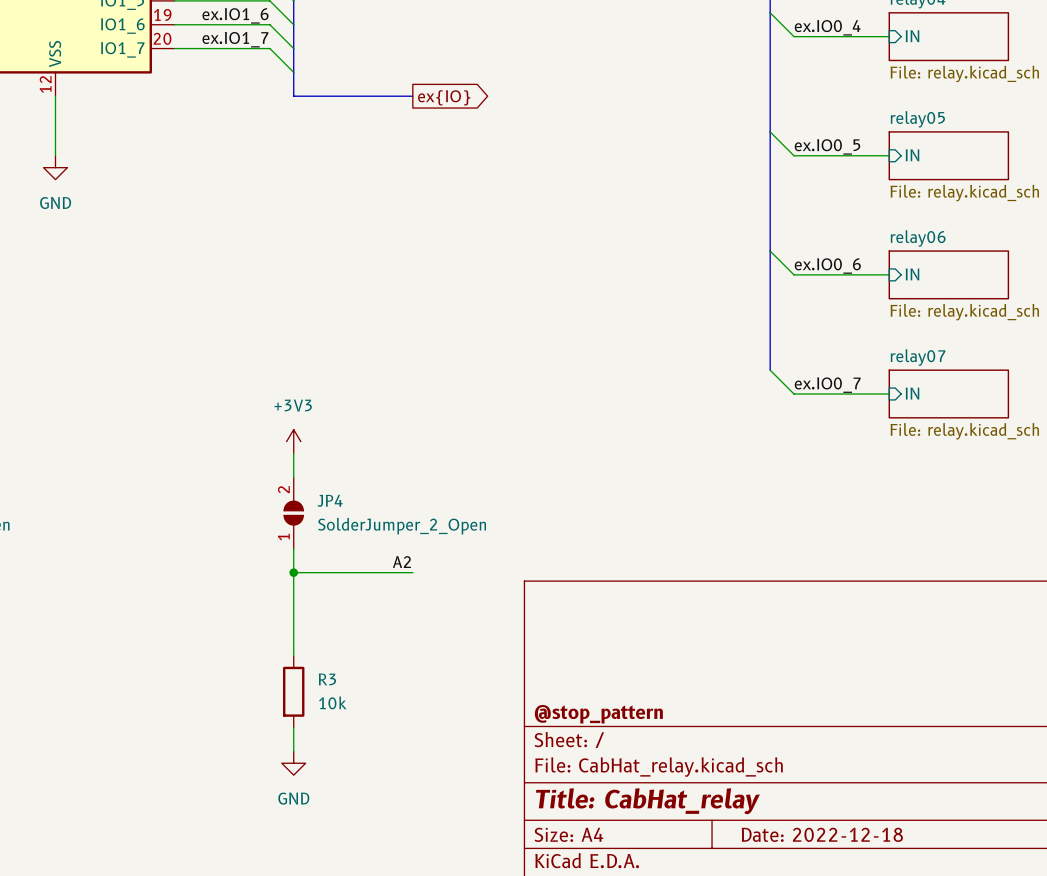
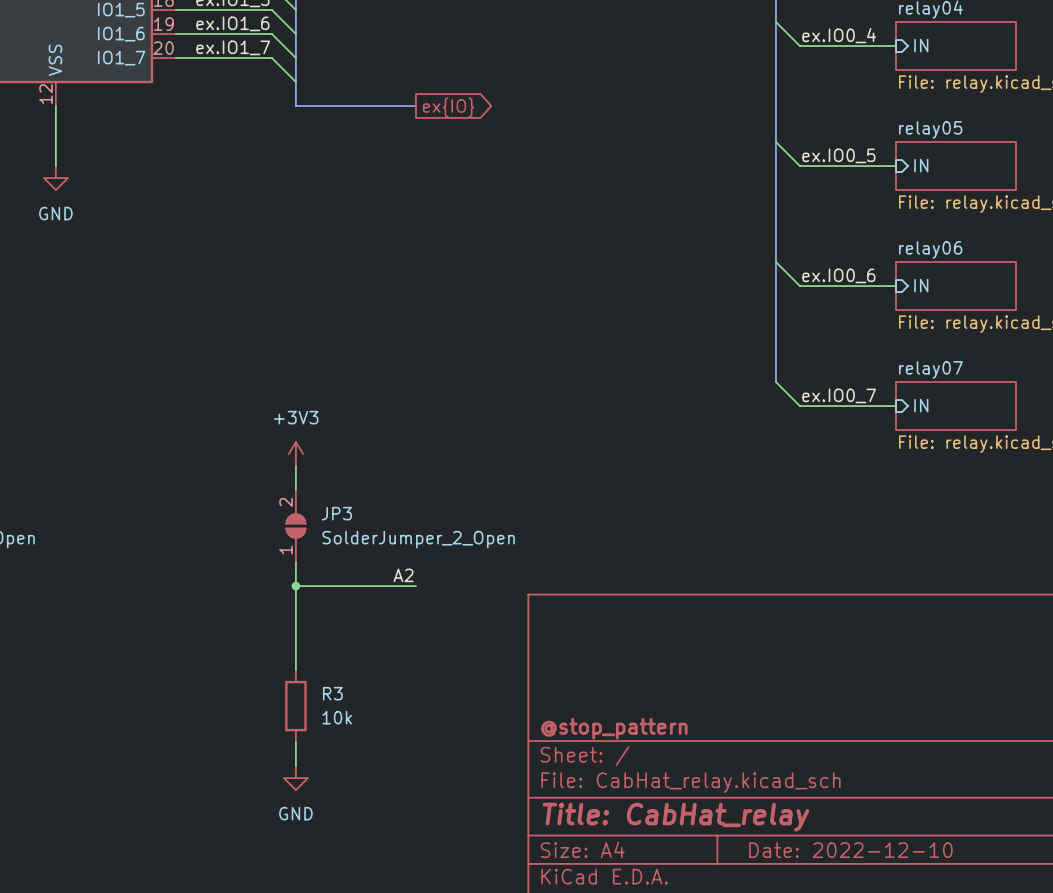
JP4 name: JP4 (330, 500) -> JP3 (336, 513)
title block: Date: 2022-12-18 (822, 834) -> Date: 2022-12-10 (850, 850)

